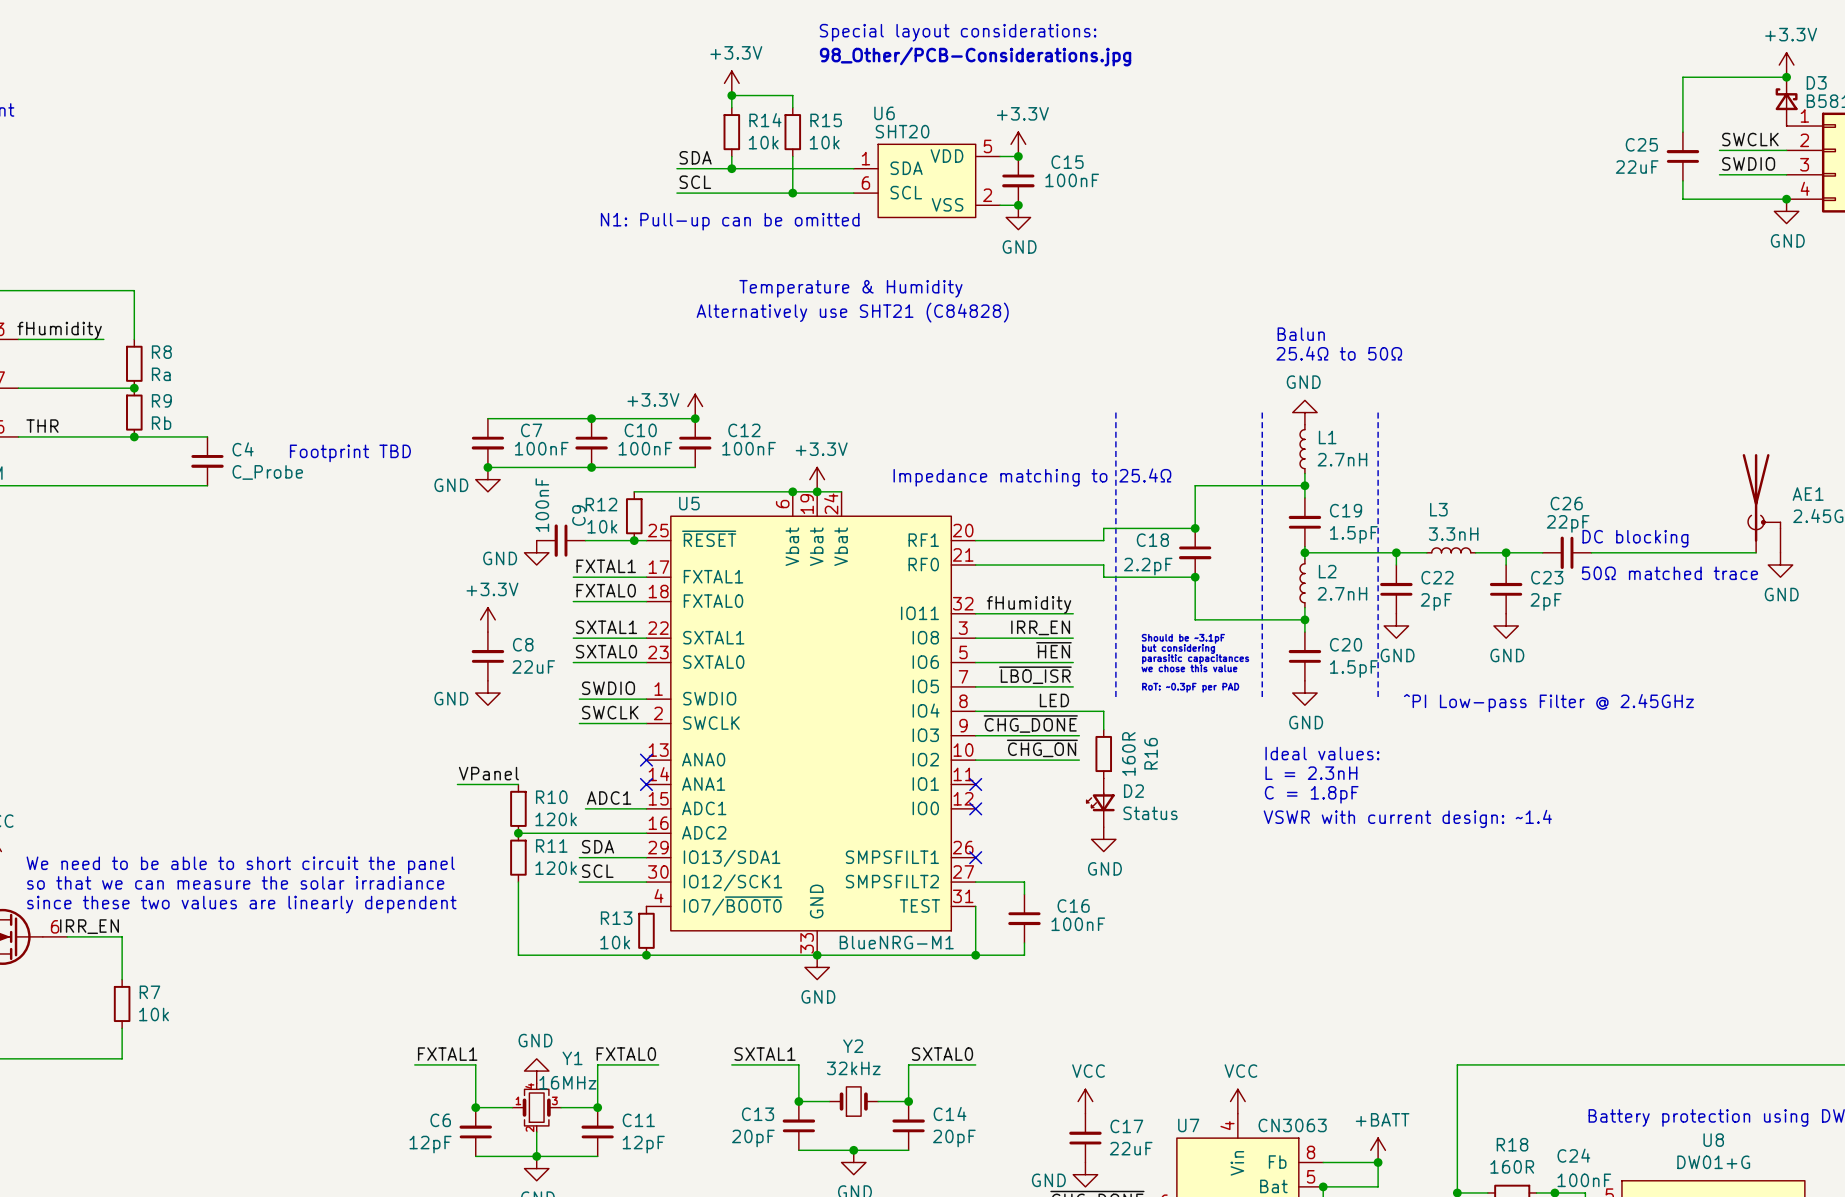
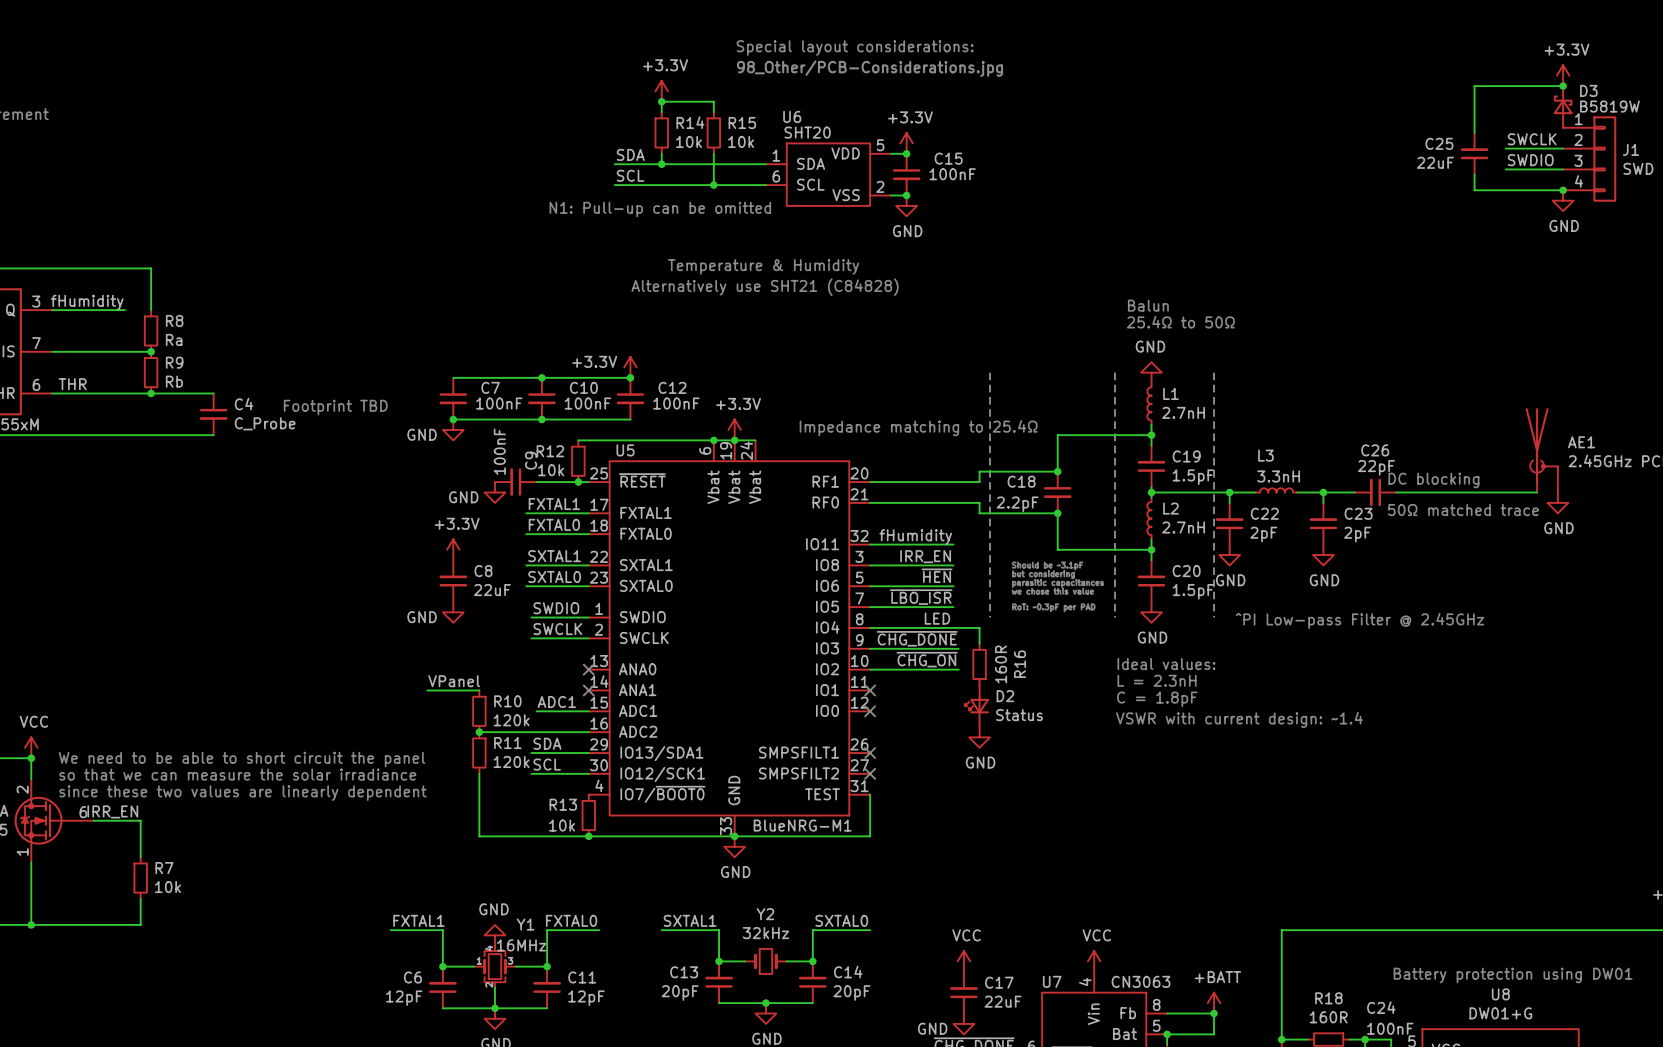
wire: (975, 882) (1024, 882) (1024, 894) -> none
no-connect mark: none -> (870, 773)
C16: 100nF (1024, 918) -> none
wire: (1024, 943) (1024, 955) (975, 955) -> none
junction: (975, 955) -> none

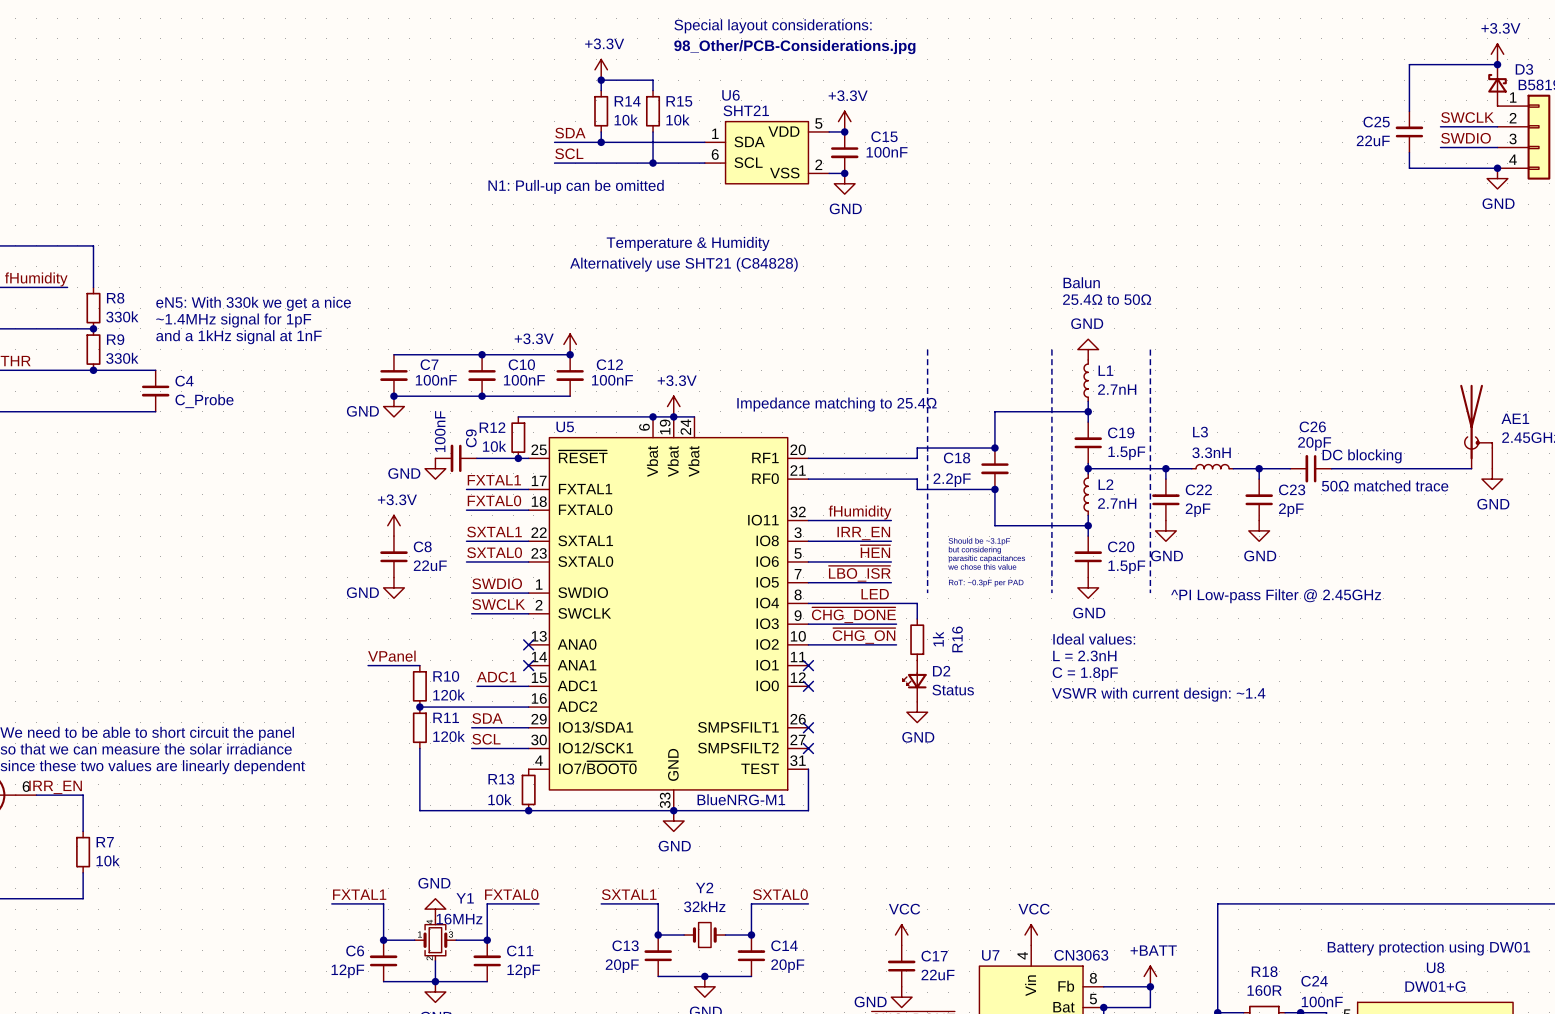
U6 value: SHT20 (807, 132) -> SHT21 (746, 110)
text: none -> eN5: With 330k we get a nice (253, 303)
R8 value: Ra (174, 339) -> 330k (122, 316)
text: none -> ~1.4MHz signal for 1pF (233, 320)
text: none -> and a 1kHz signal at 1nF (238, 337)
R9 value: Rb (174, 381) -> 330k (122, 358)
text: Footprint TBD (335, 407) -> none
C26 value: 22pF (1376, 467) -> 20pF (1314, 443)
R16 value: 160R (1001, 664) -> 1k (938, 639)

